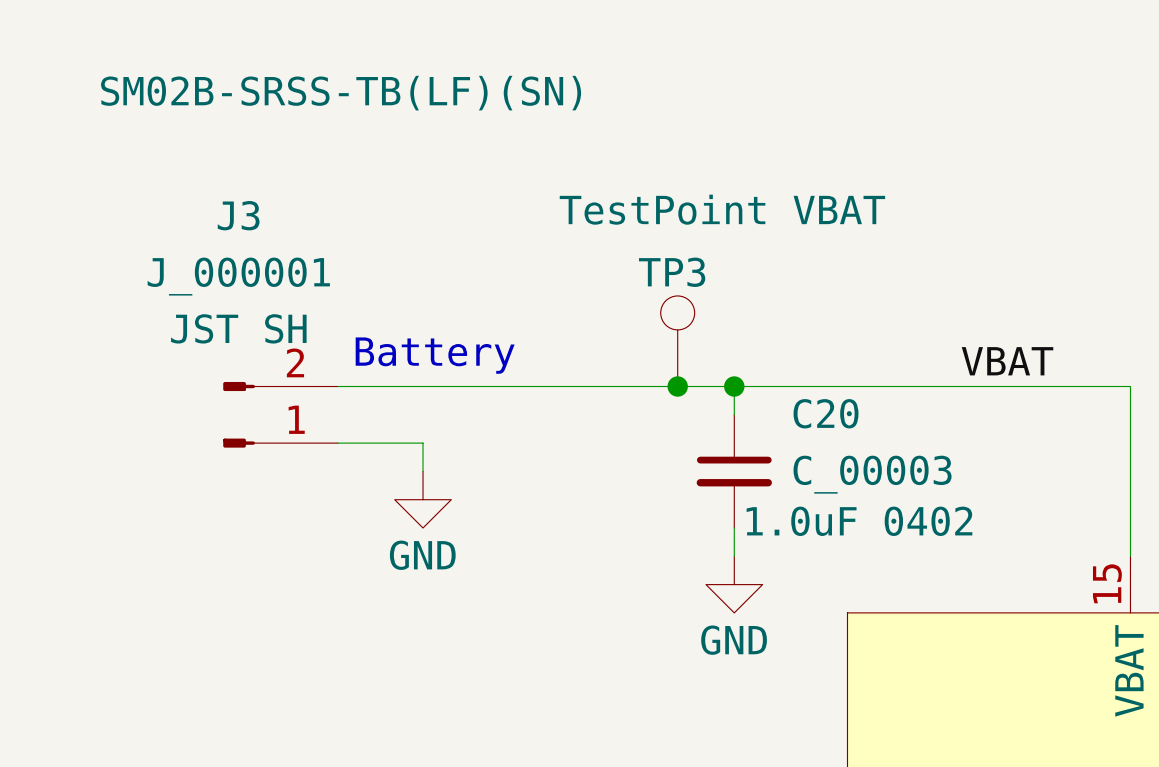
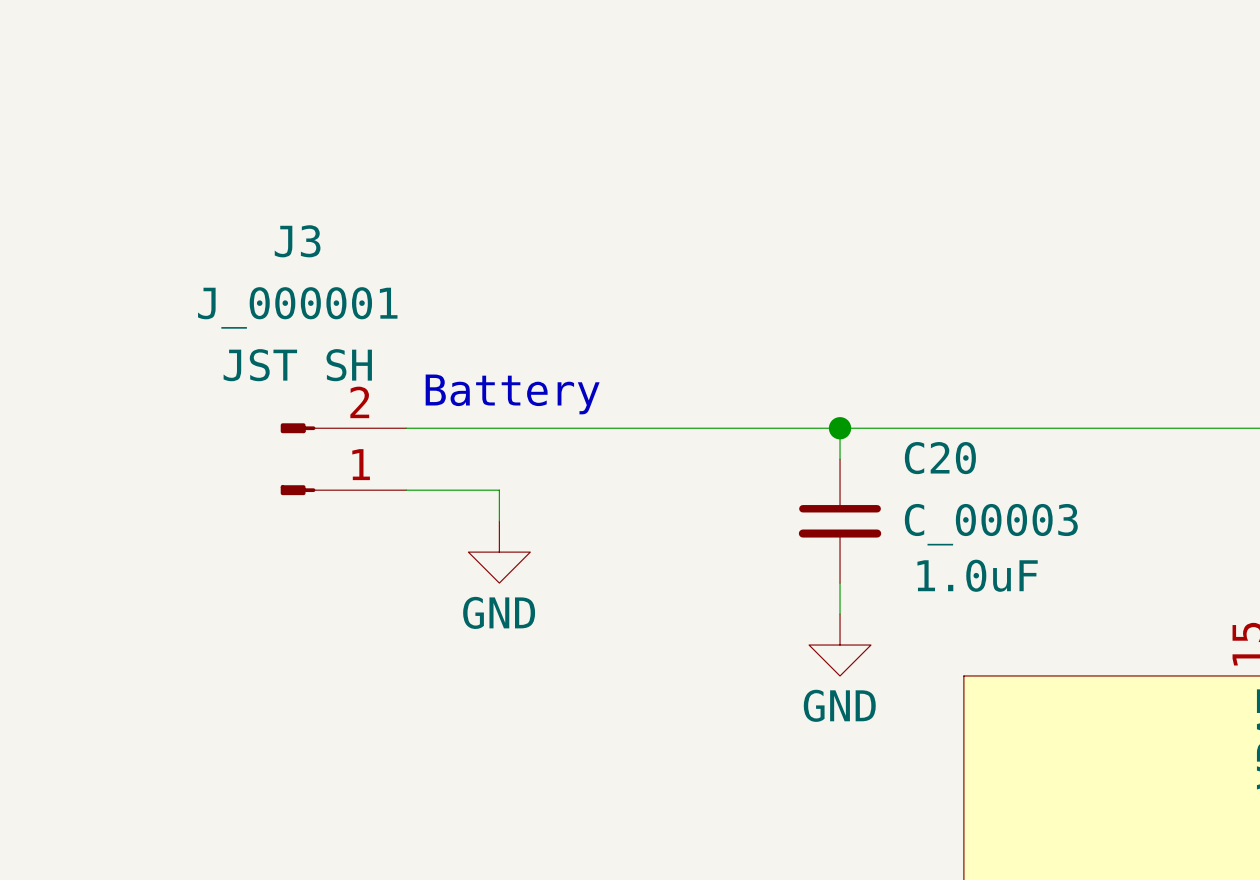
J3 text: SM02B-SRSS-TB(LF)(SN) (341, 93) -> none
TP3: TestPoint VBAT (677, 341) -> none
label: VBAT (1007, 361) -> none
junction: (677, 386) -> none
C20 text: 1.0uF 0402 (859, 521) -> 1.0uF (977, 575)

